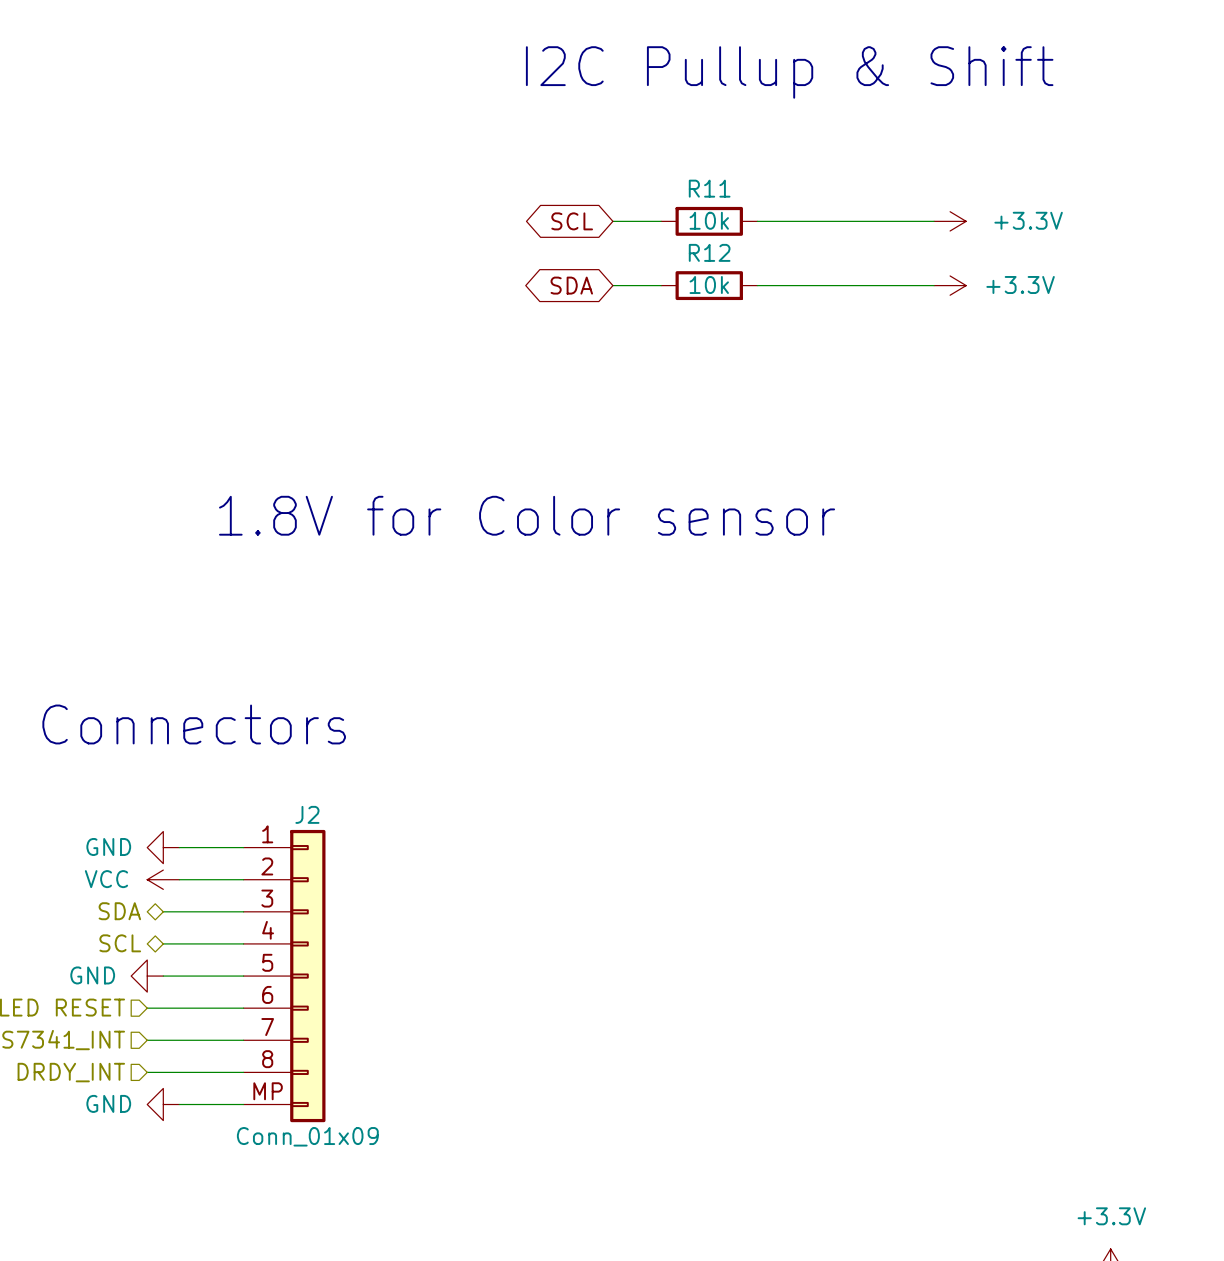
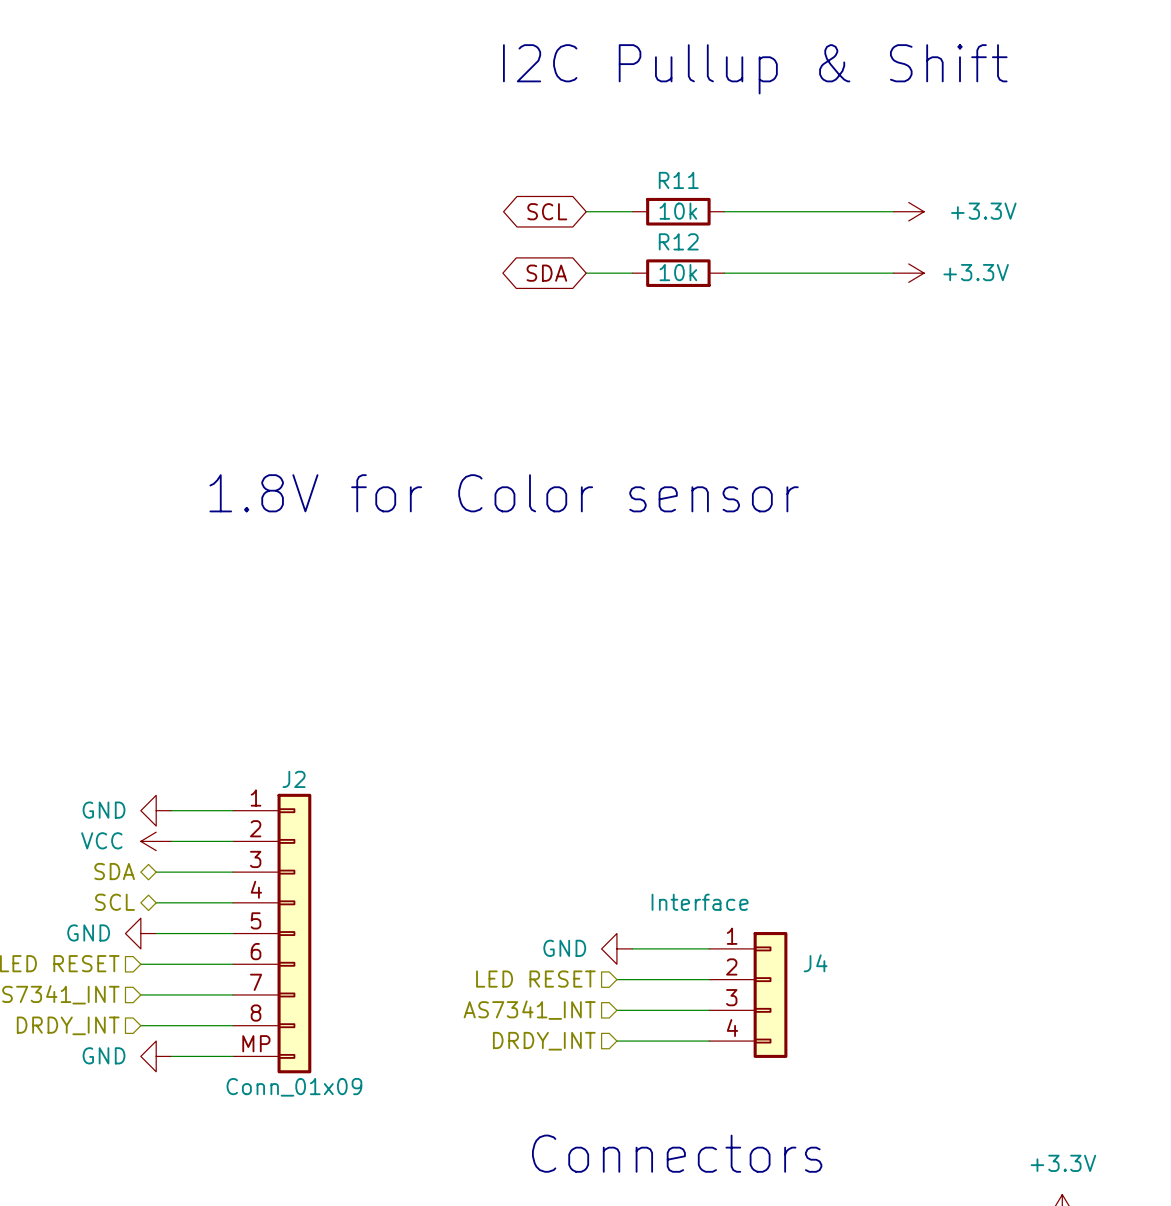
text: Connectors (194, 724) -> none
power symbol: none -> GND (616, 948)
wire: none -> (632, 948) (709, 948)
hierarchical label: none -> LED RESET (535, 979)
wire: none -> (616, 979) (709, 979)
J4: none -> Interface (748, 994)
hierarchical label: none -> AS7341_INT (529, 1010)
wire: none -> (616, 1010) (709, 1010)
hierarchical label: none -> DRDY_INT (544, 1041)
wire: none -> (616, 1041) (709, 1041)
text: none -> Connectors (677, 1153)

